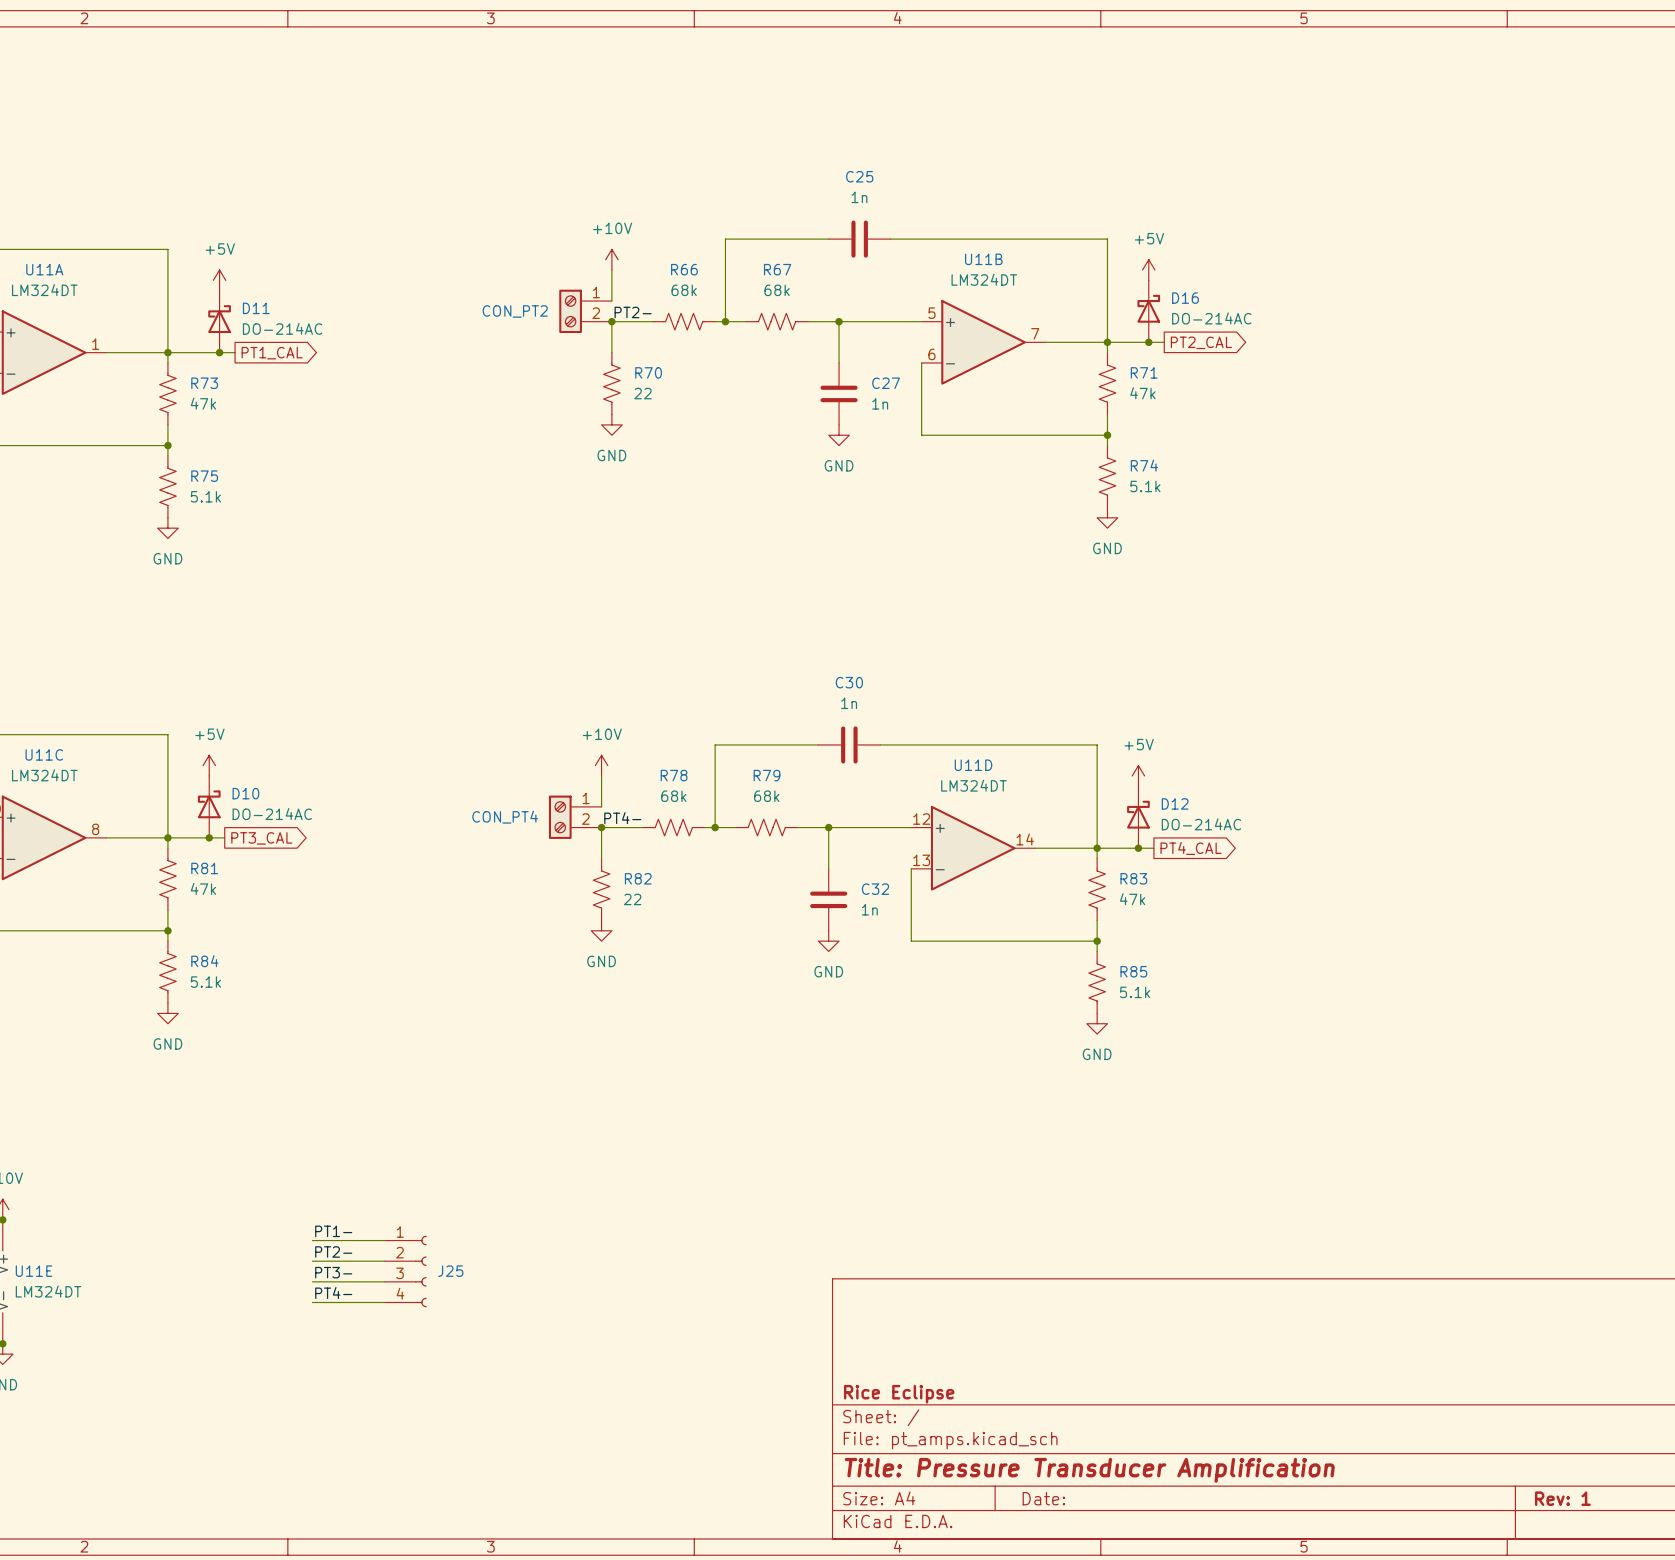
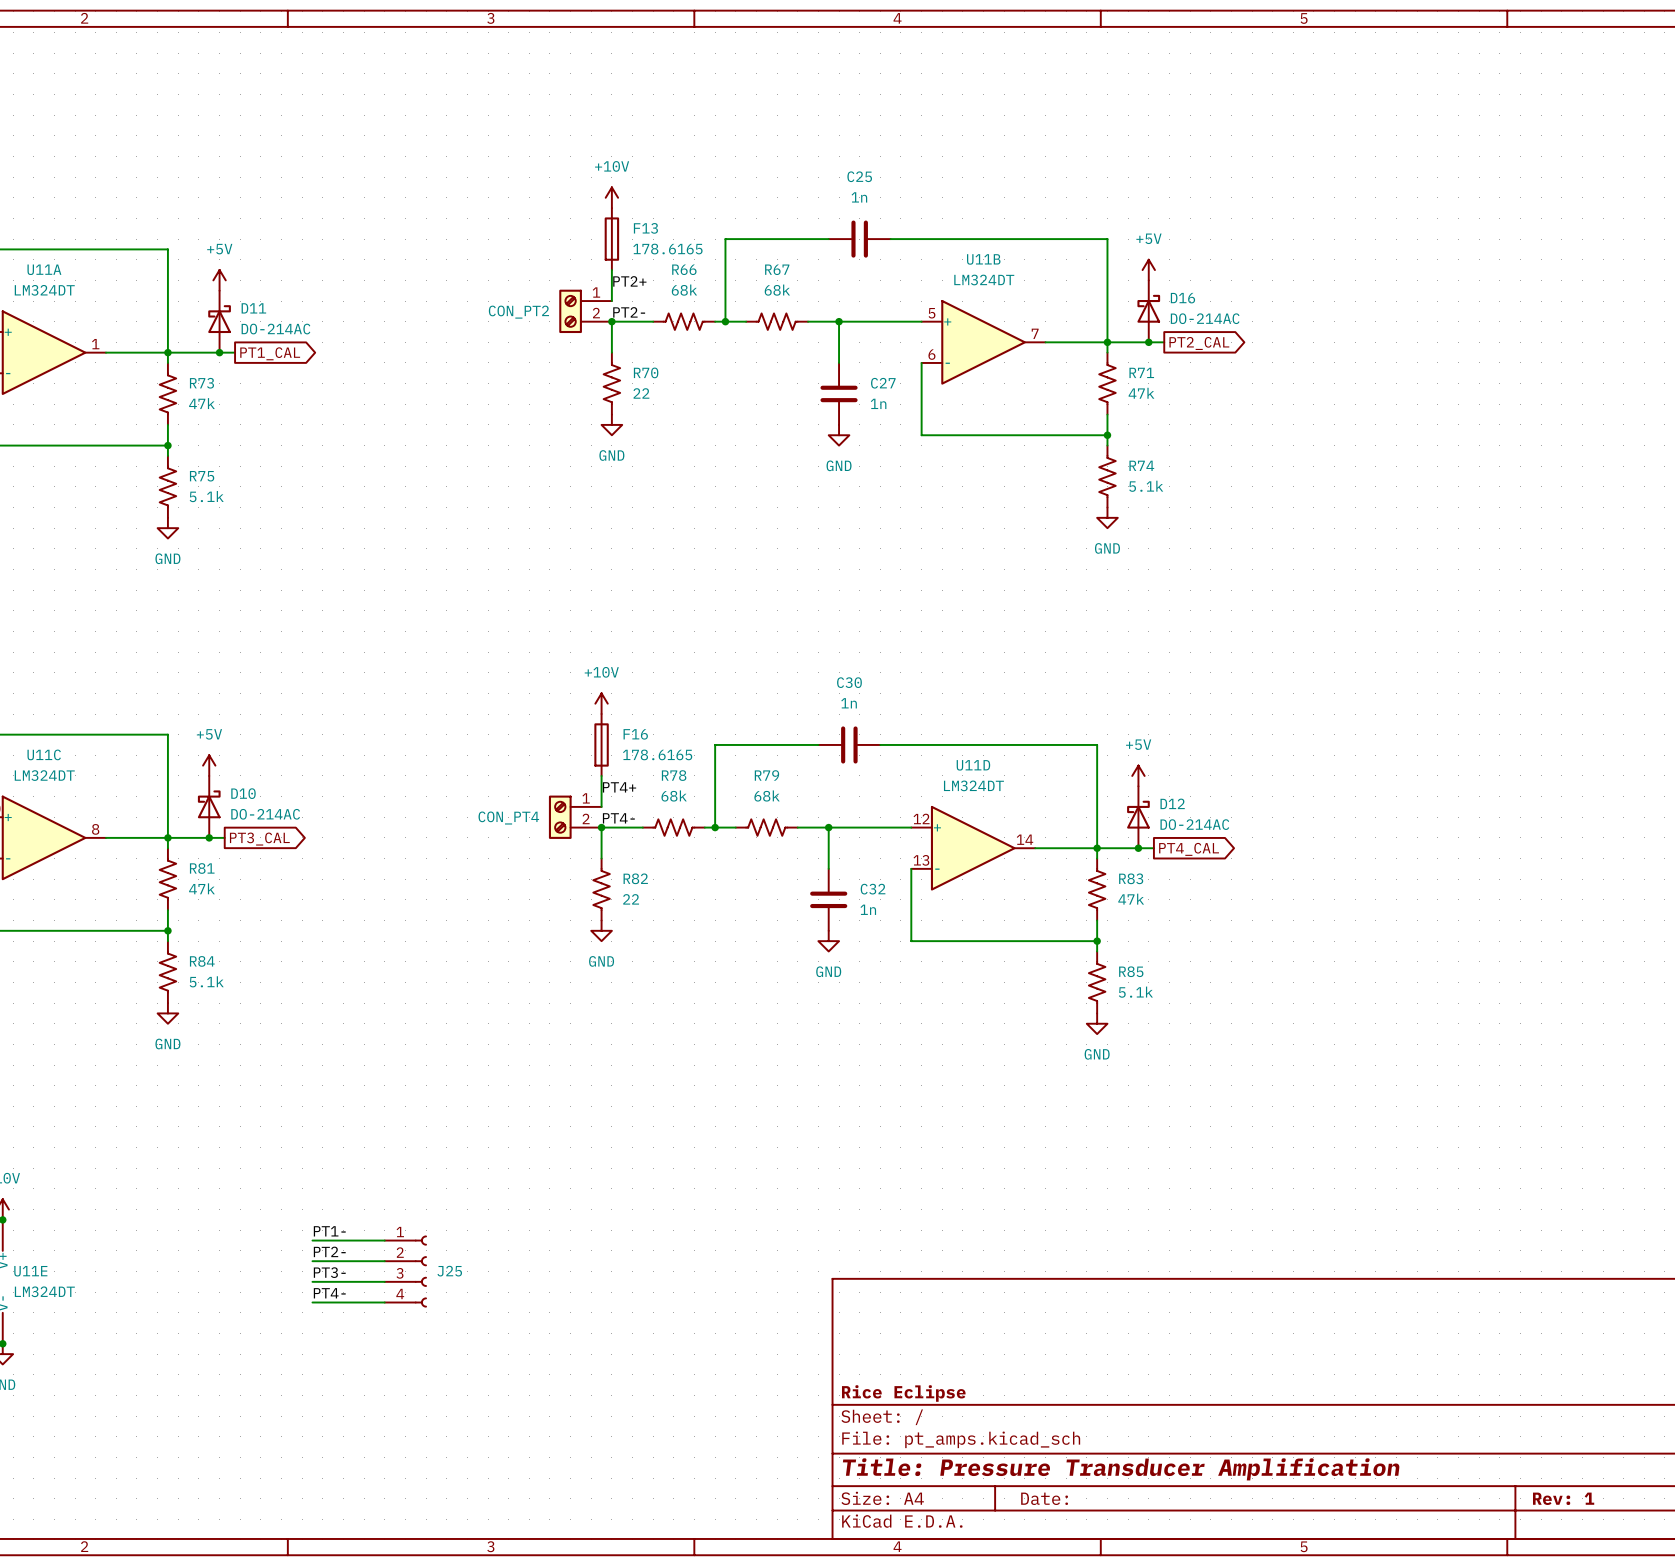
F13: none -> 178.6165 (611, 239)
power symbol position: +10V (611, 259) -> +10V (611, 197)
label: none -> PT2+ (629, 281)
F16: none -> 178.6165 (601, 744)
power symbol position: +10V (601, 765) -> +10V (601, 703)
label: none -> PT4+ (619, 787)

